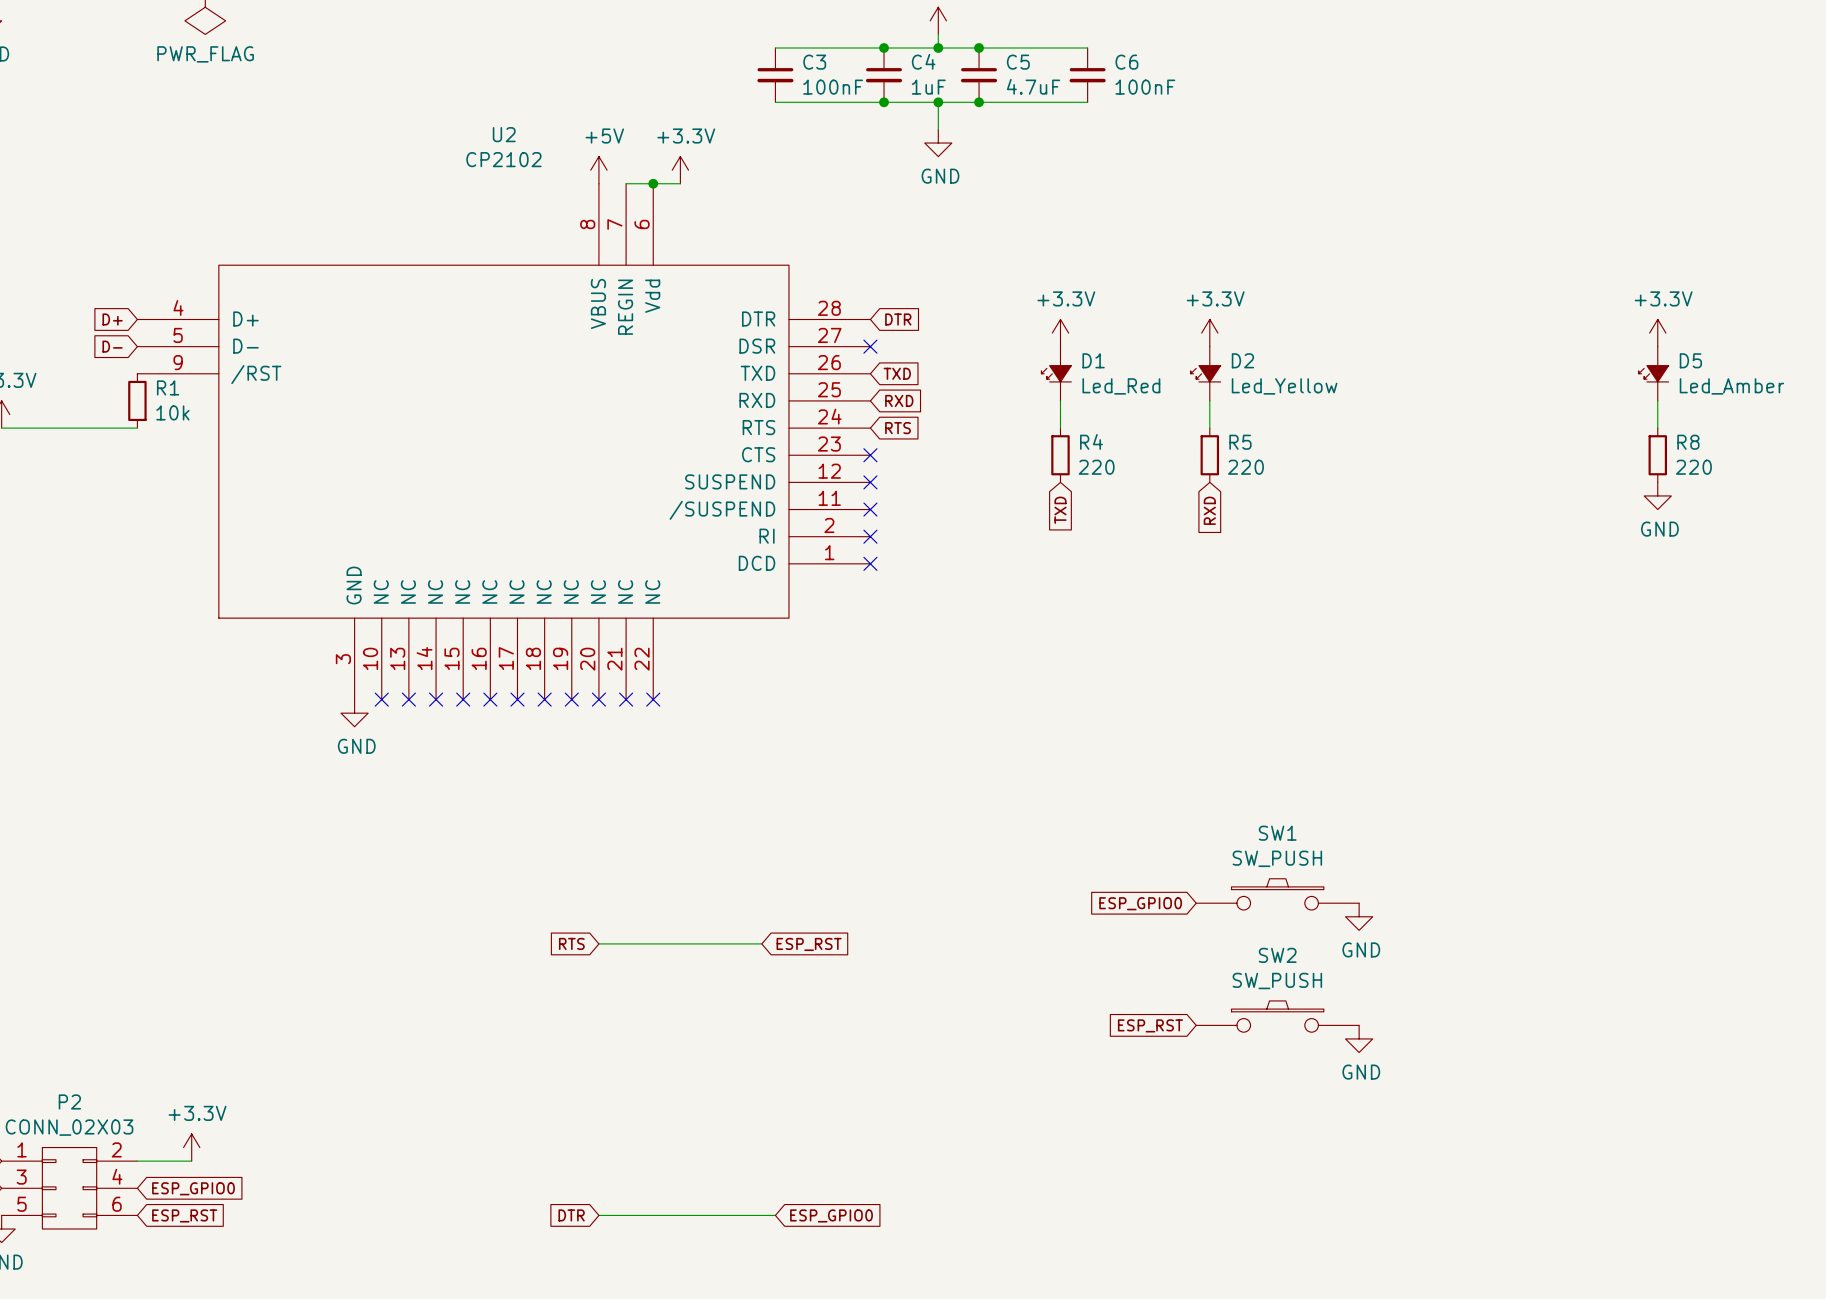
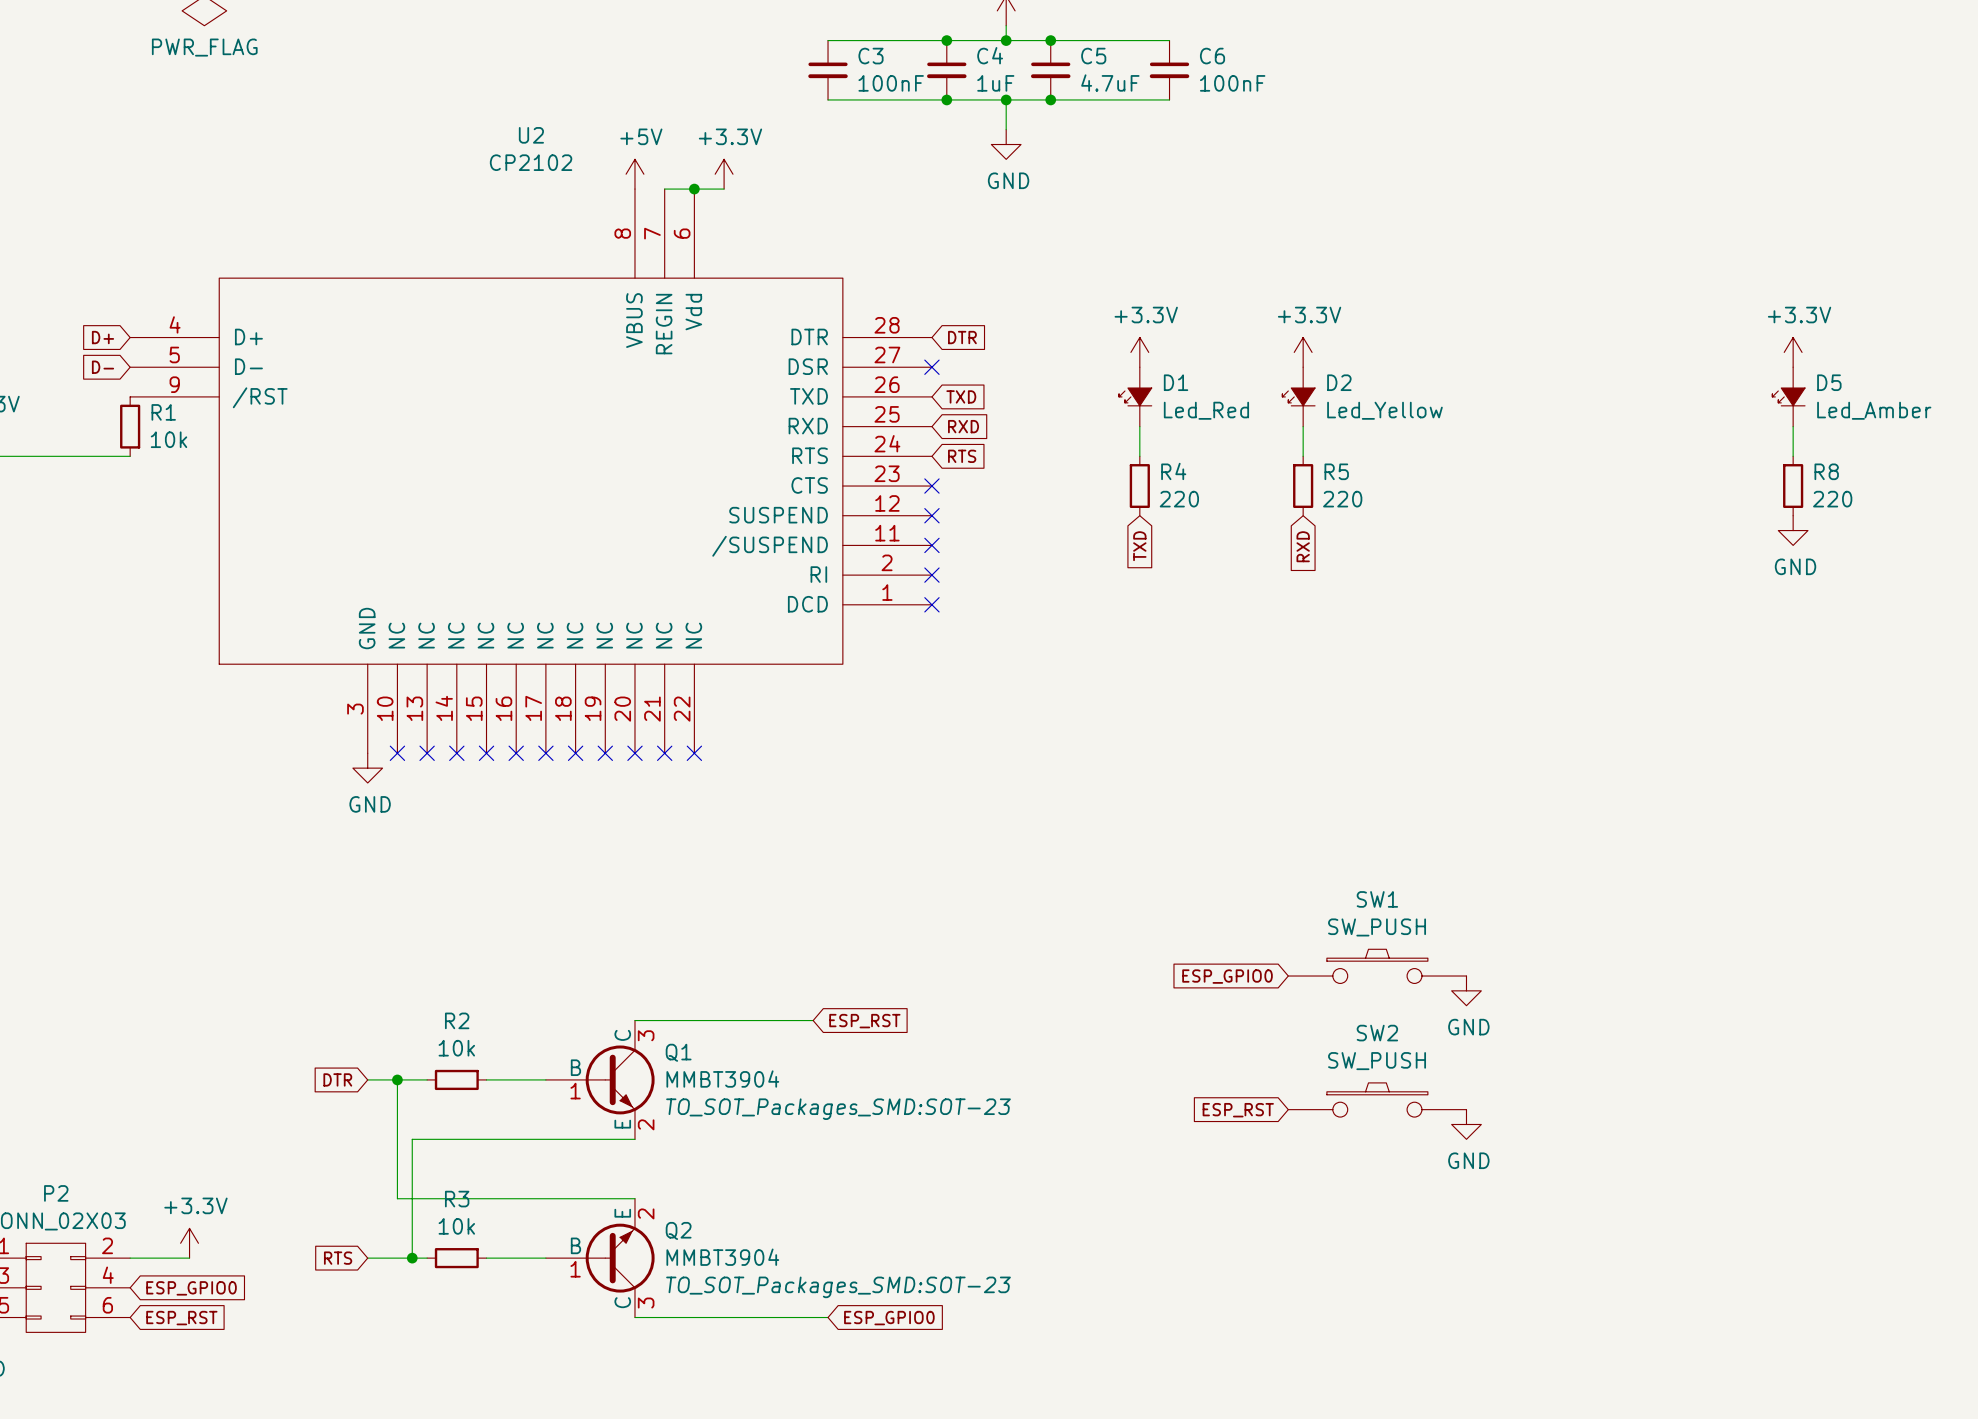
global label: RTS (571, 943) -> none
global label: none -> DTR (337, 1079)
wire: none -> (367, 1079) (427, 1079)
wire: none -> (397, 1079) (397, 1198) (634, 1198)
junction: none -> (397, 1079)
R2: none -> 10k (456, 1079)
wire: none -> (486, 1079) (545, 1079)
Q1: none -> MMBT3904 (600, 1079)
wire: none -> (634, 1139) (412, 1139) (412, 1258)
global label: none -> RTS (338, 1258)
wire: none -> (367, 1258) (427, 1258)
junction: none -> (412, 1258)
R3: none -> 10k (456, 1258)
wire: none -> (486, 1258) (545, 1258)
Q2: none -> MMBT3904 (600, 1258)
global label: DTR (571, 1215) -> none

